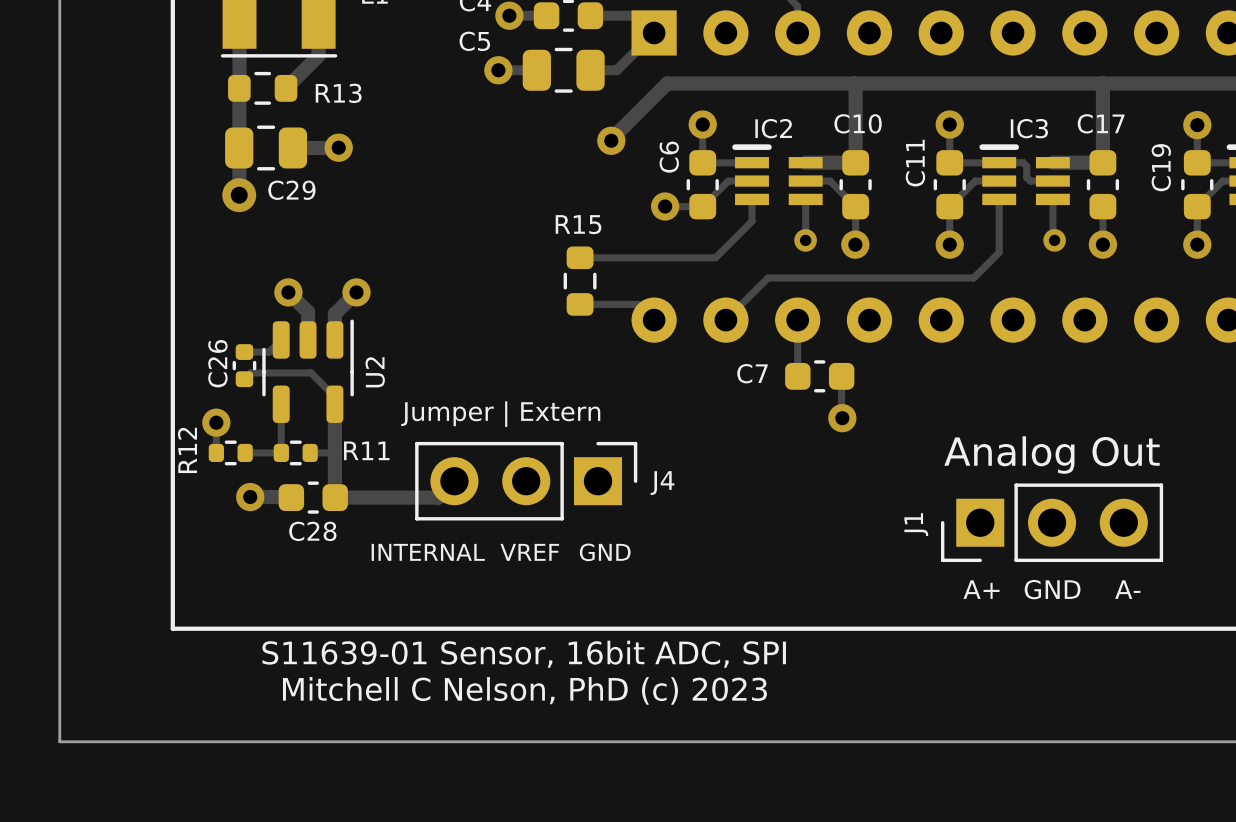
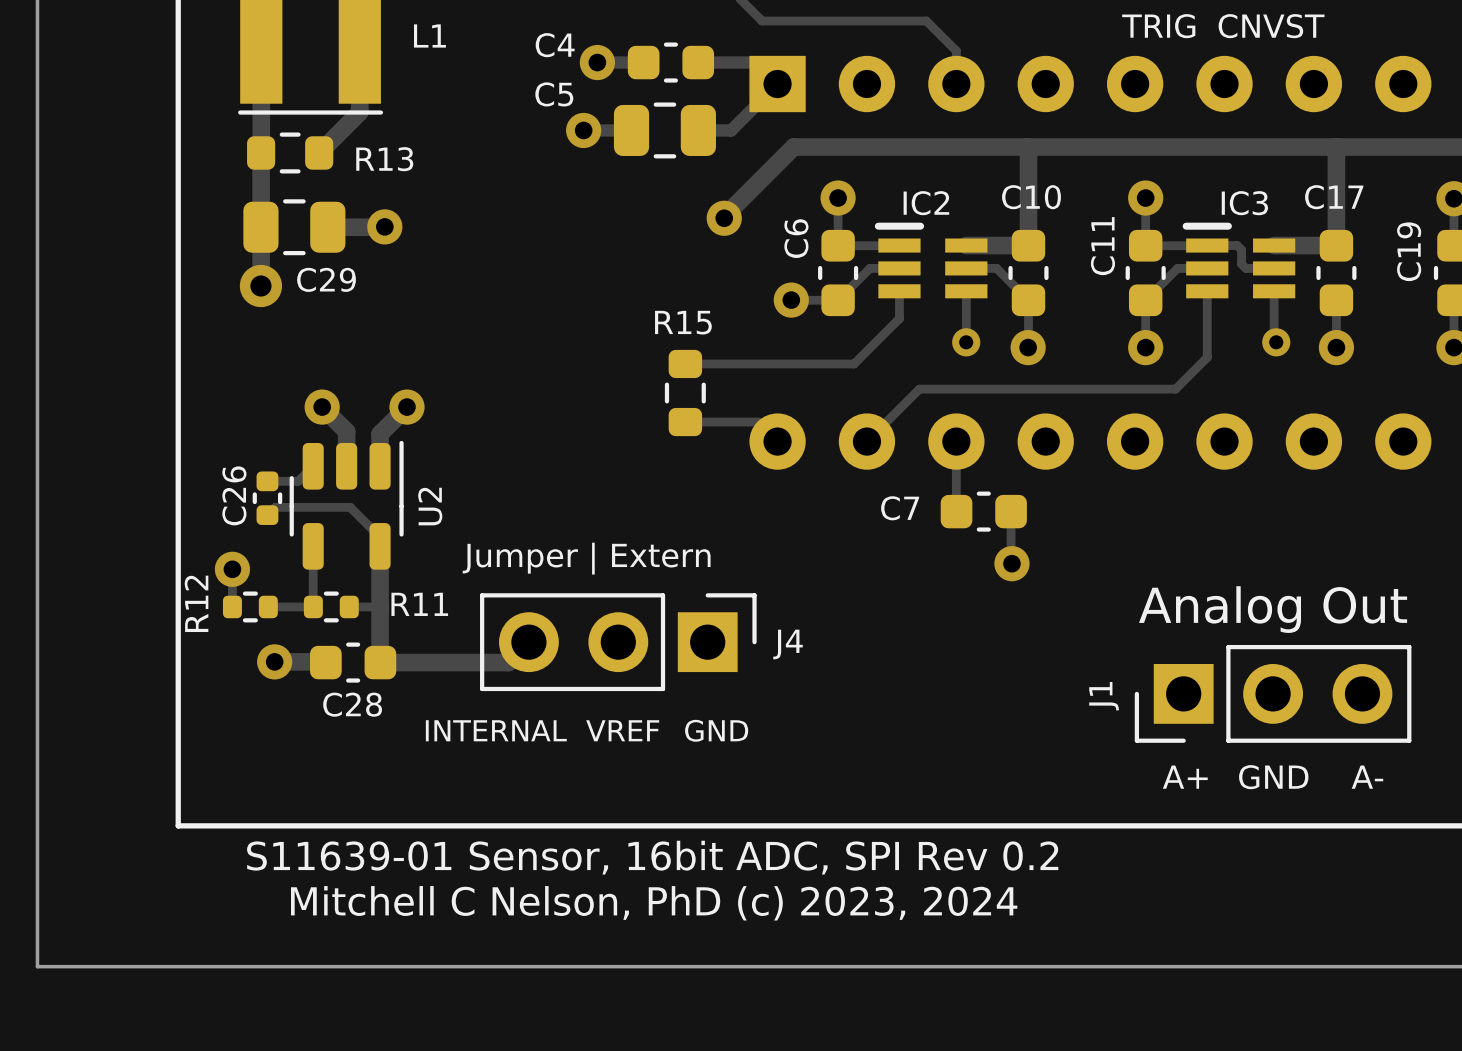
text: S11639-01 Sensor, 16bit ADC, SPI (524, 654) -> S11639-01 Sensor, 16bit ADC, SPI Rev 0.2 (652, 857)
text: Mitchell C Nelson, PhD (c) 2023 (524, 690) -> Mitchell C Nelson, PhD (c) 2023, 2024 (654, 903)

